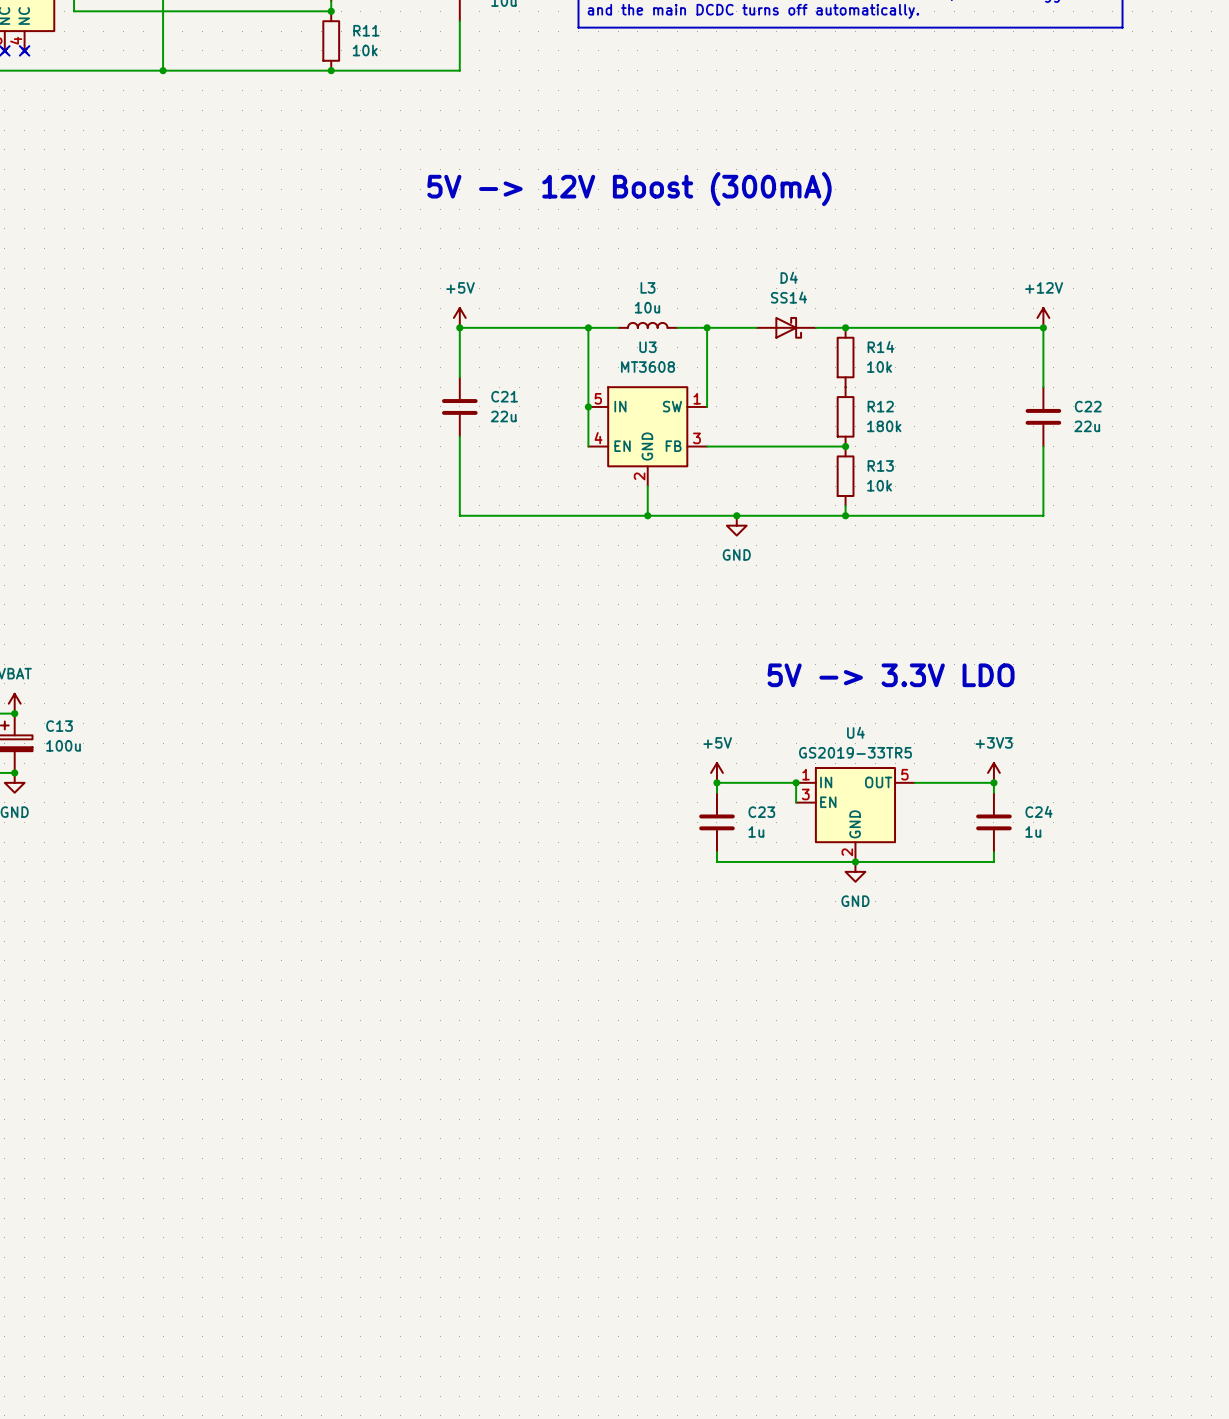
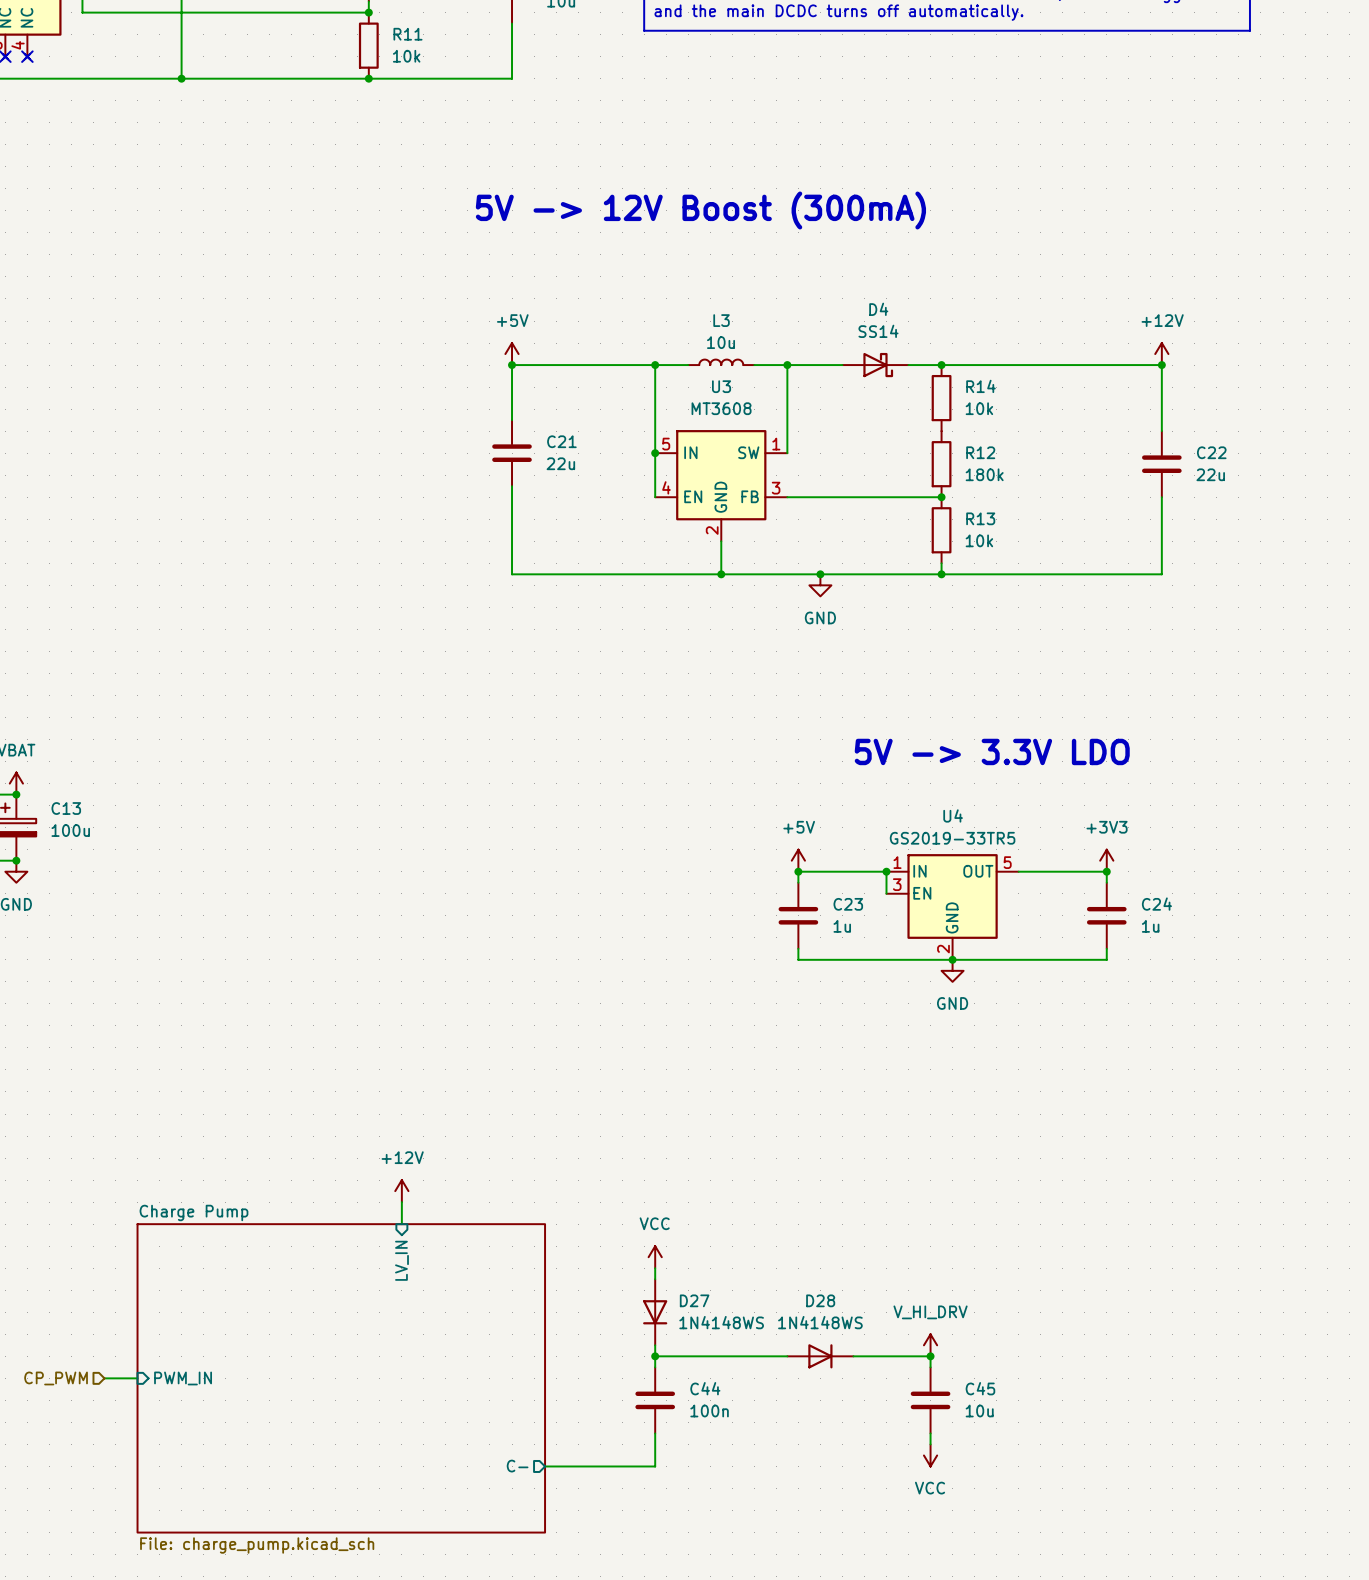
power symbol: none -> +12V (401, 1191)
wire: none -> (401, 1202) (401, 1224)
power symbol: none -> VCC (655, 1257)
sheet pin: none -> LV_IN (401, 1260)
wire: none -> (655, 1268) (655, 1279)
D27: none -> 1N4148WS (655, 1312)
wire: none -> (655, 1345) (655, 1367)
power symbol: none -> V_HI_DRV (930, 1345)
wire: none -> (655, 1356) (787, 1356)
junction: none -> (655, 1356)
D28: none -> 1N4148WS (820, 1356)
wire: none -> (853, 1356) (930, 1356) (930, 1367)
junction: none -> (930, 1356)
hierarchical label: none -> CP_PWM (56, 1378)
wire: none -> (104, 1378) (137, 1378)
sheet pin: none -> PWM_IN (183, 1378)
sheet Charge Pump: none -> File: charge_pump.kicad_sch (341, 1378)
C44: none -> 100n (655, 1400)
C45: none -> 10u (930, 1400)
wire: none -> (655, 1433) (655, 1466) (545, 1466)
wire: none -> (930, 1433) (930, 1444)
power symbol: none -> VCC (930, 1455)
sheet pin: none -> C- (517, 1466)

